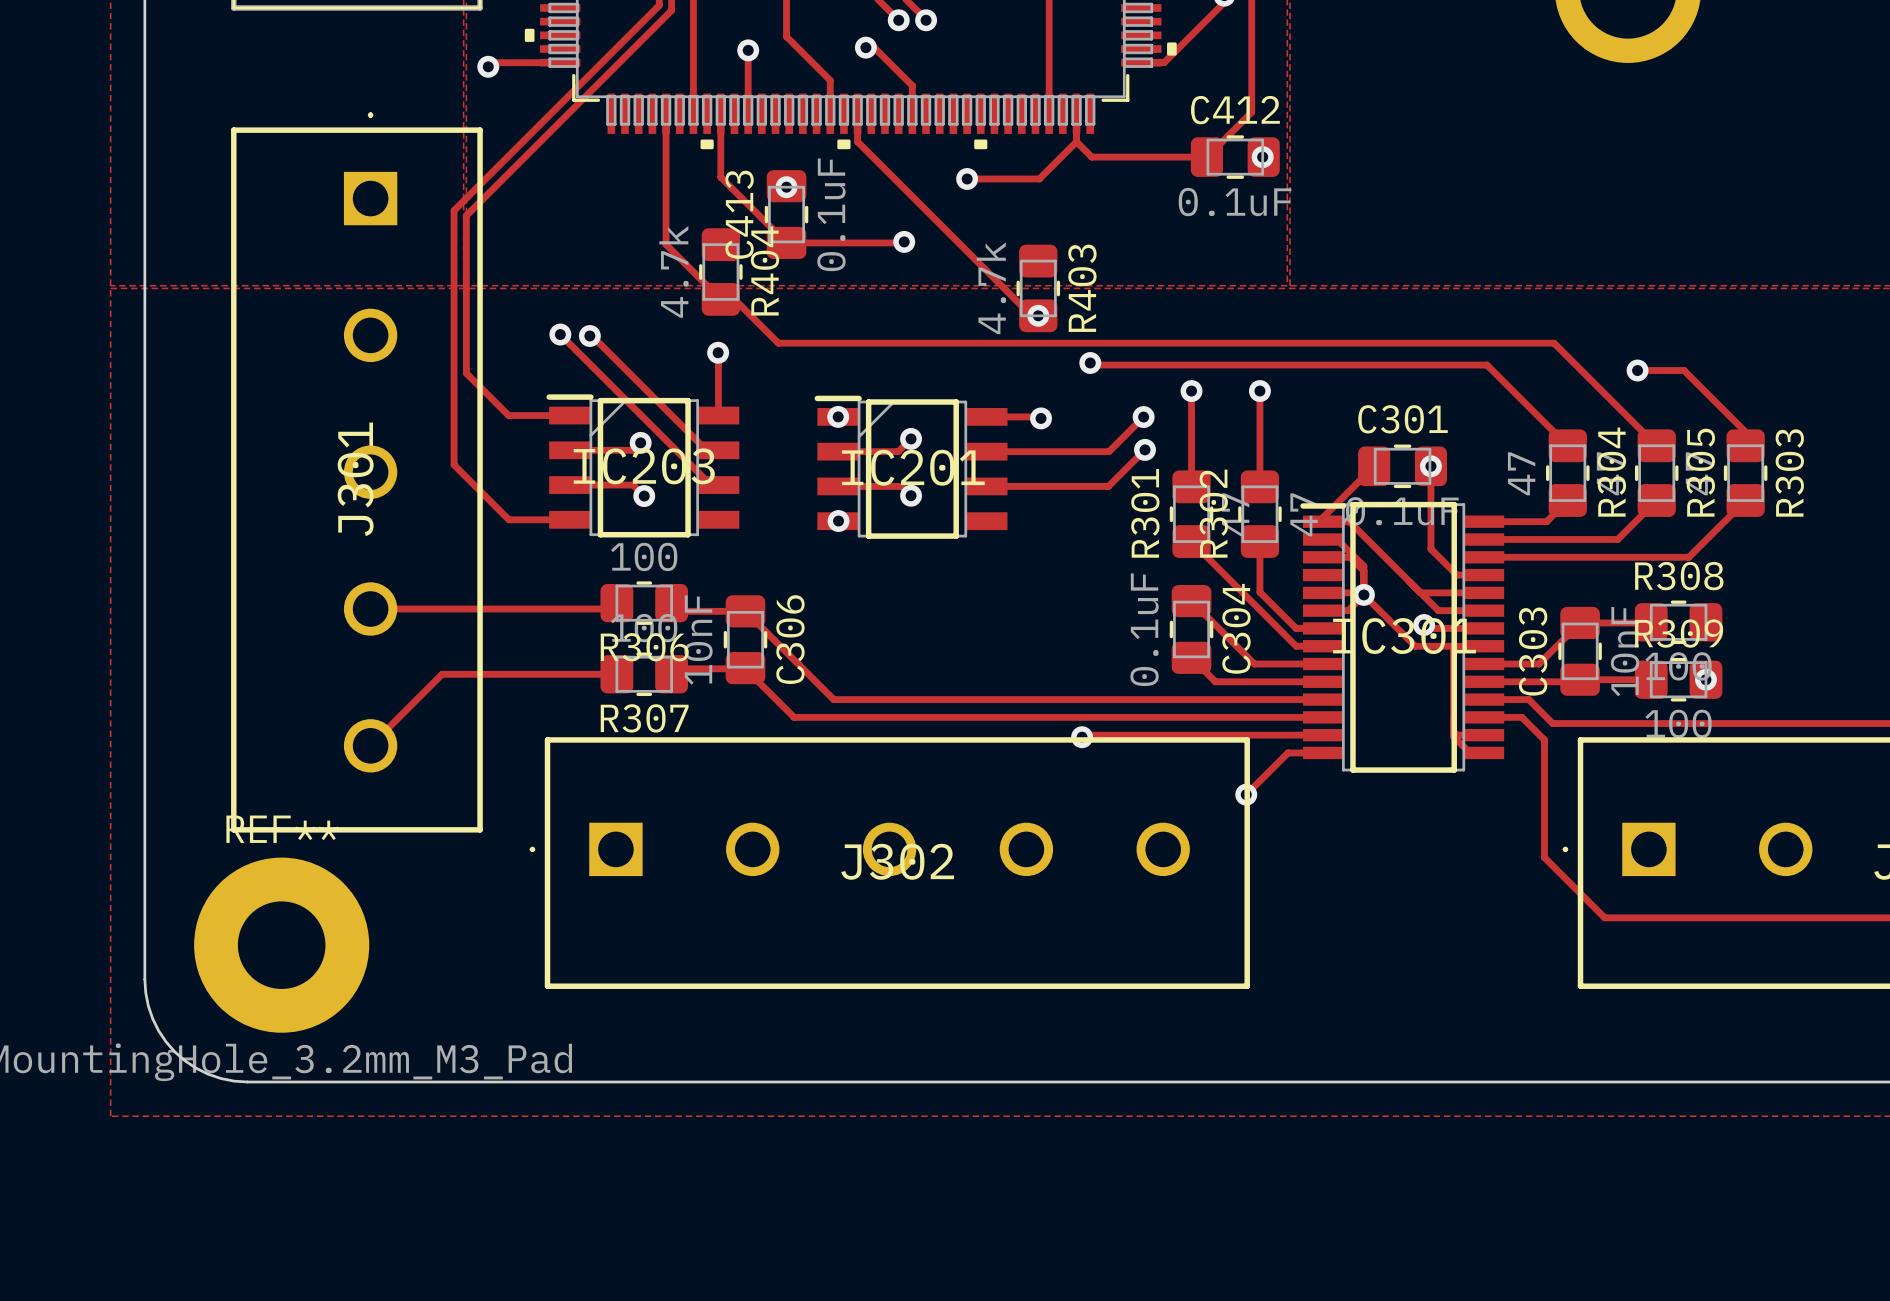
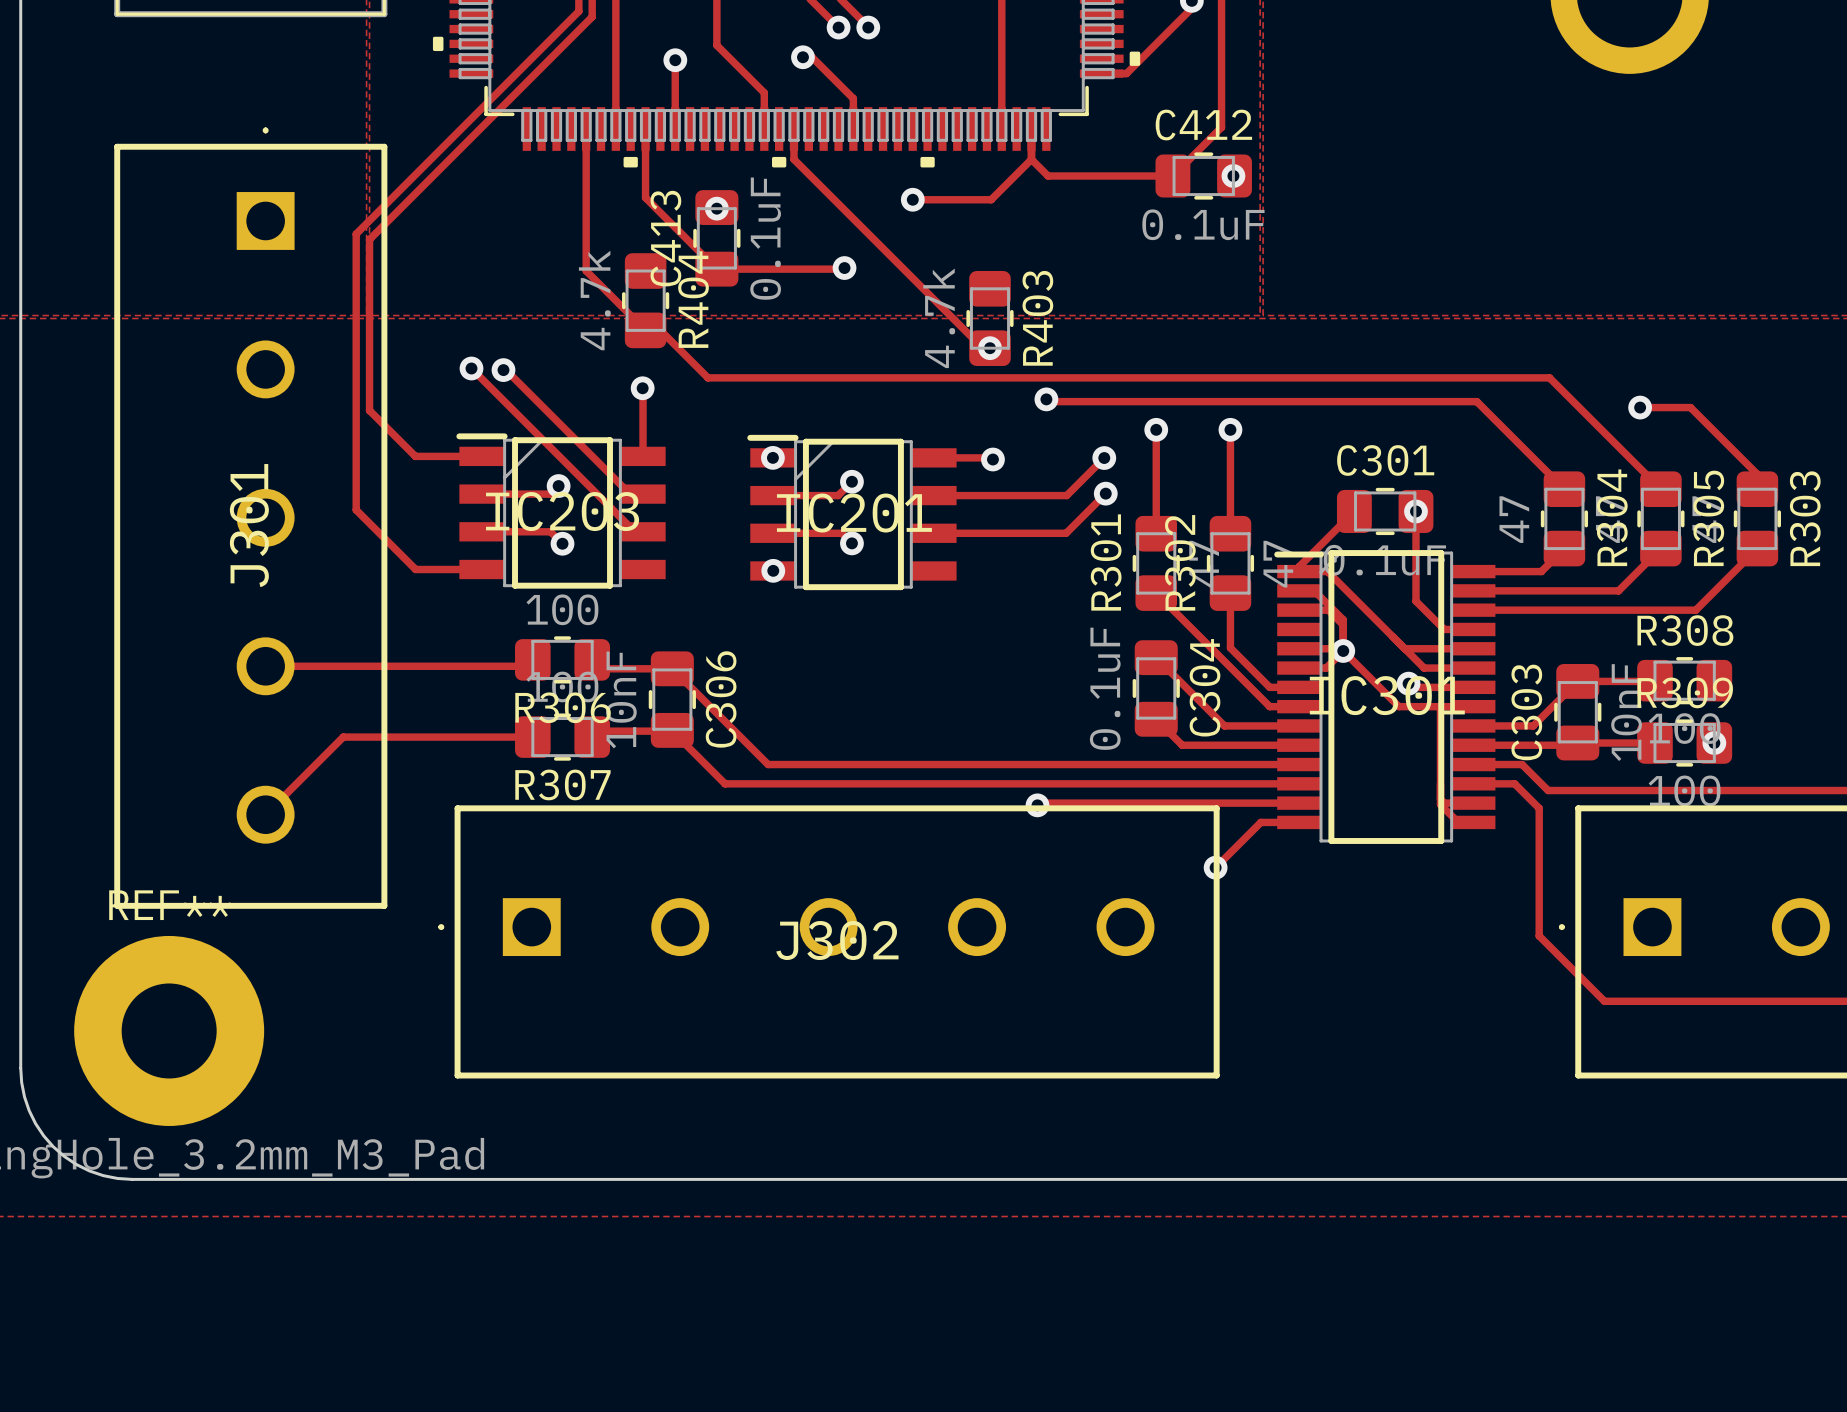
track: (560, 62) (492, 62) (488, 66) -> none
via: (488, 66) -> none

